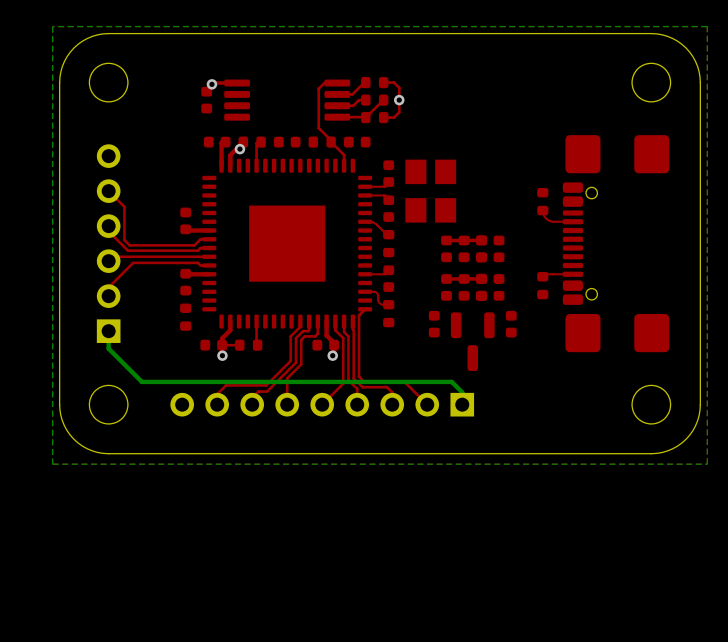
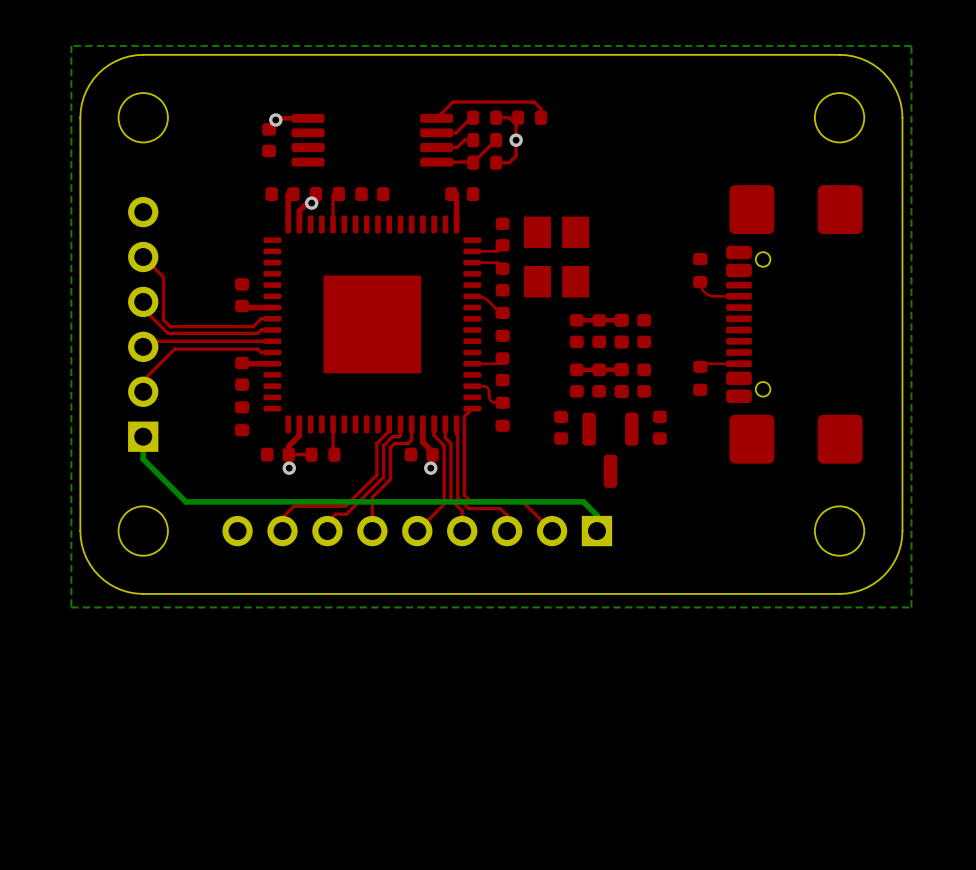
top track: (337, 83) (324, 83) (318, 88) (318, 128) (344, 155) (344, 165) -> (436, 118) (452, 102) (534, 102) (541, 108) (541, 117)
part position: (322, 142) -> (529, 117)
top track: none -> (455, 194) (456, 224)

